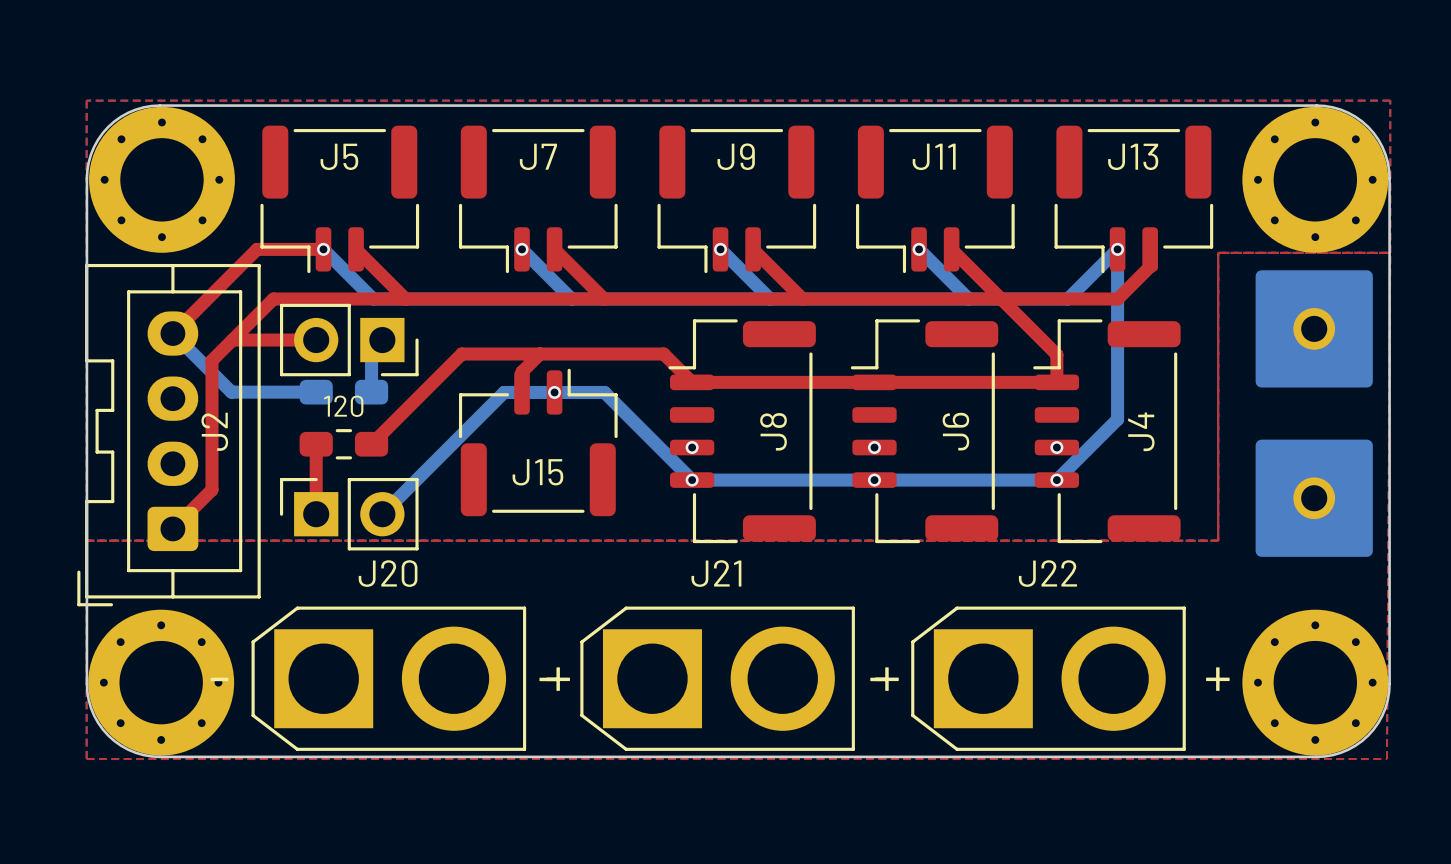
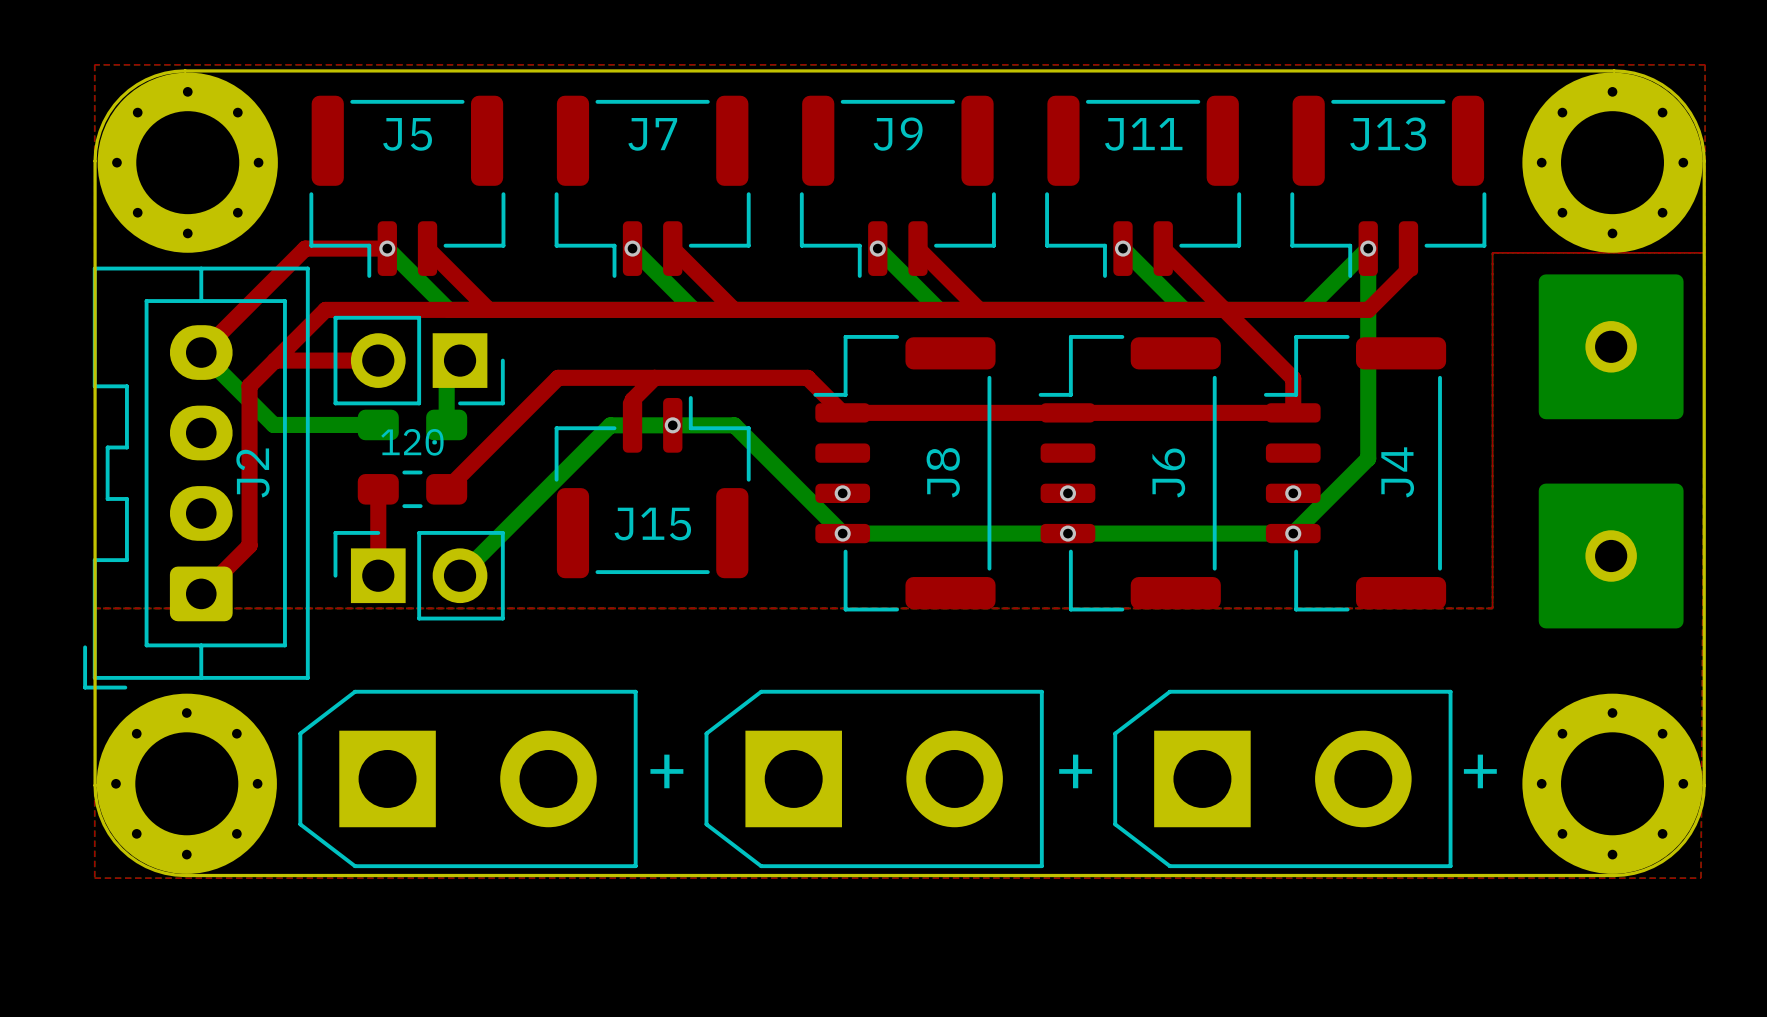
J20: (388, 678) -> none
part: none -> (468, 778)
J21: (717, 678) -> none
part: none -> (874, 778)
J22: (1048, 678) -> none
part: none -> (1282, 778)

